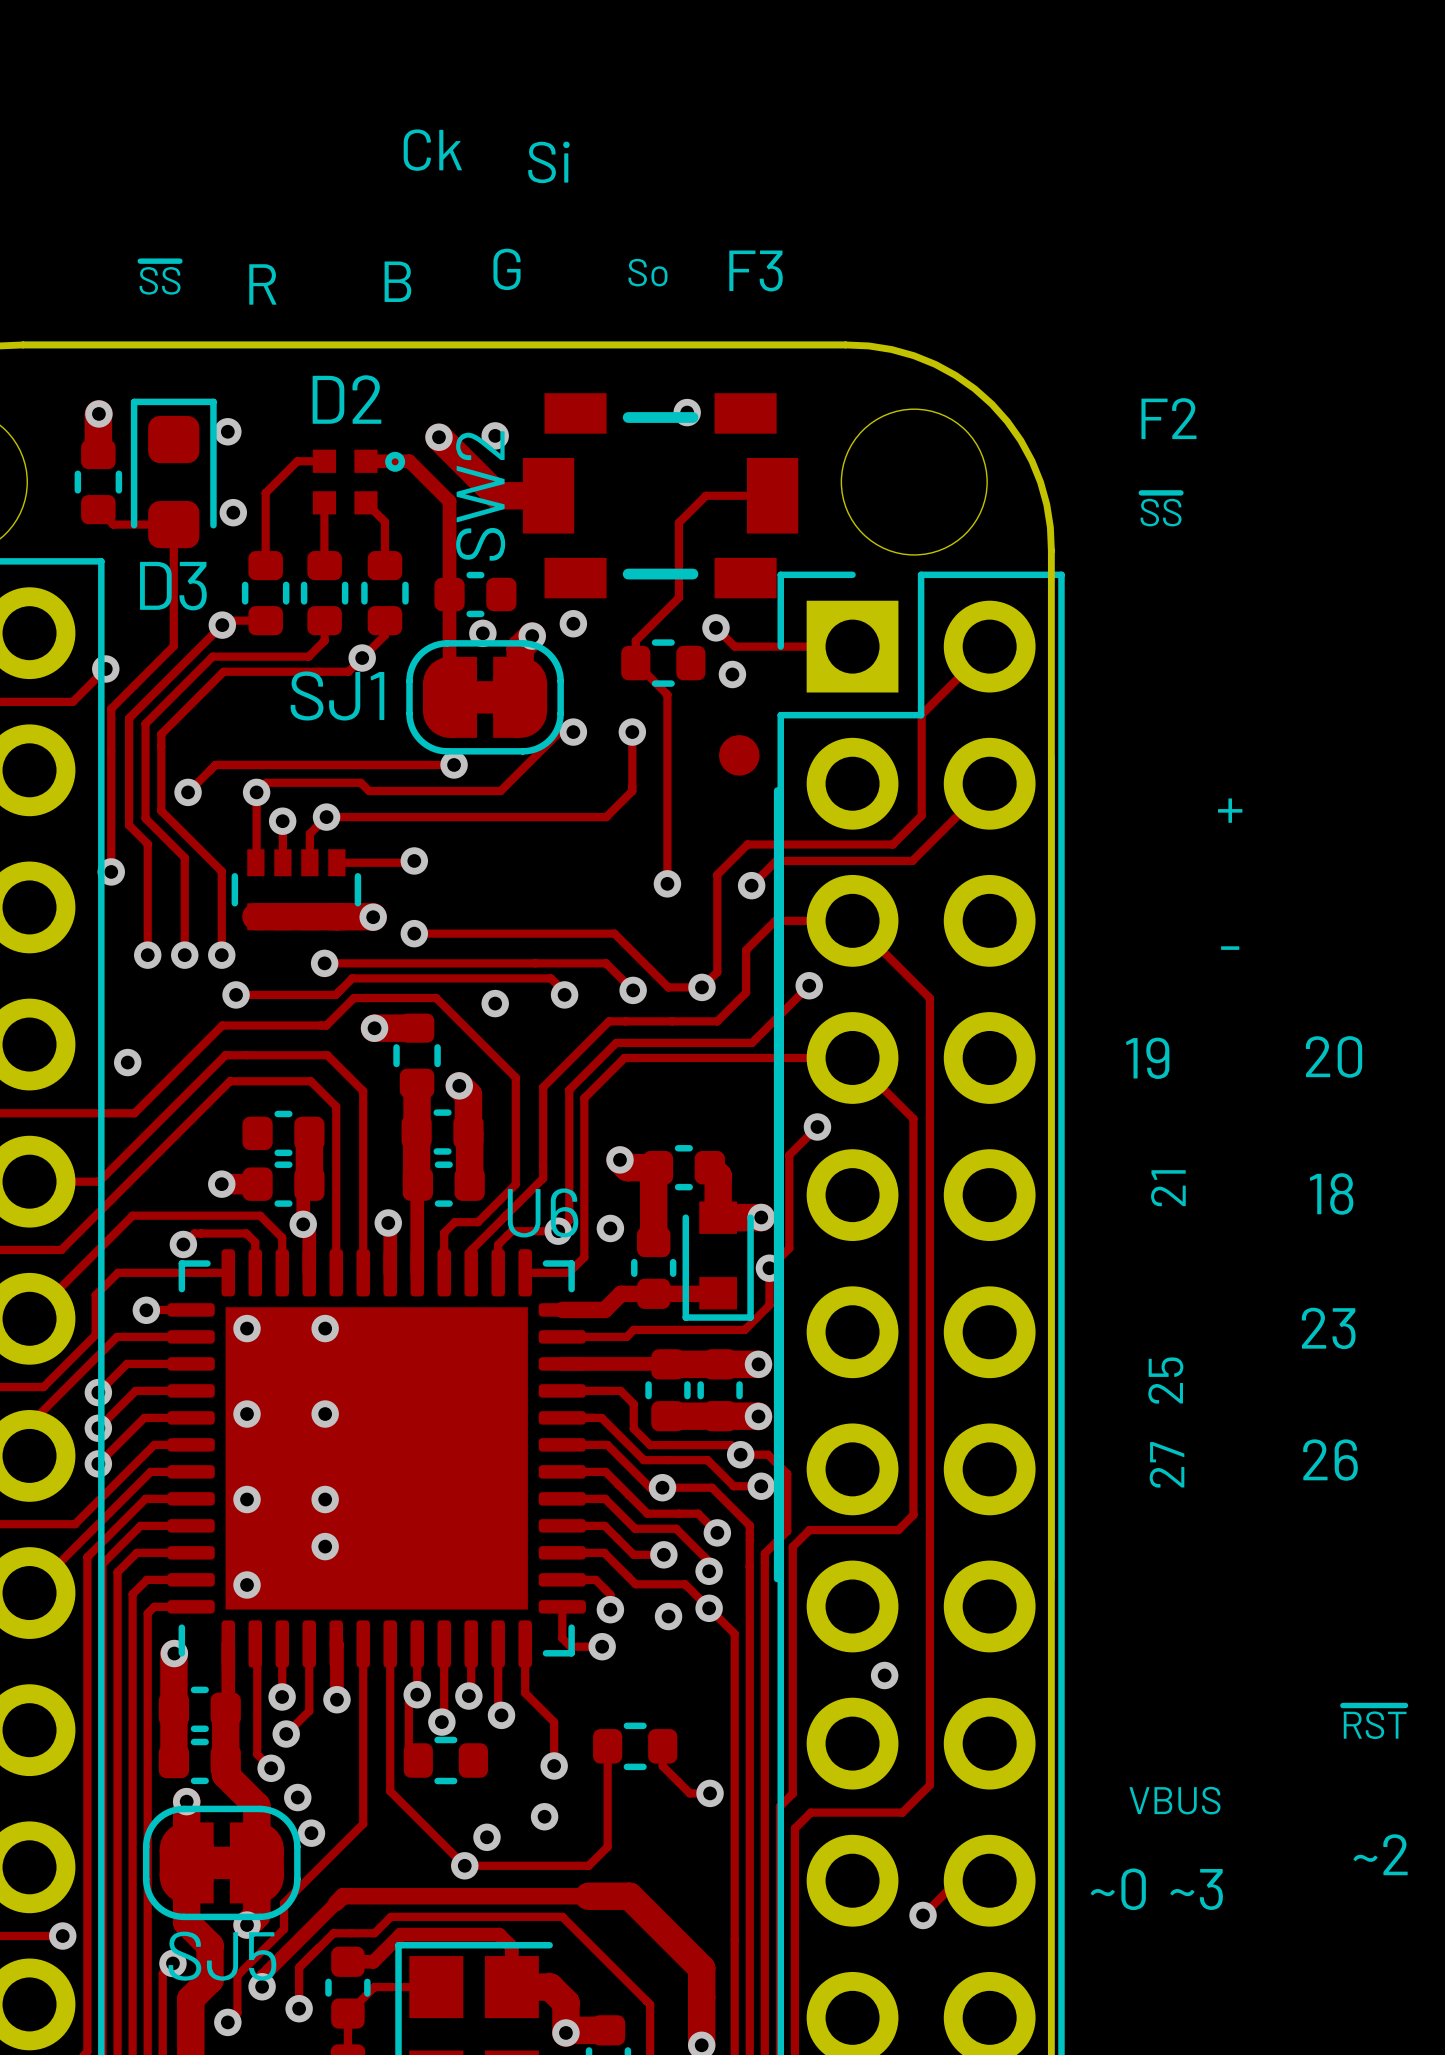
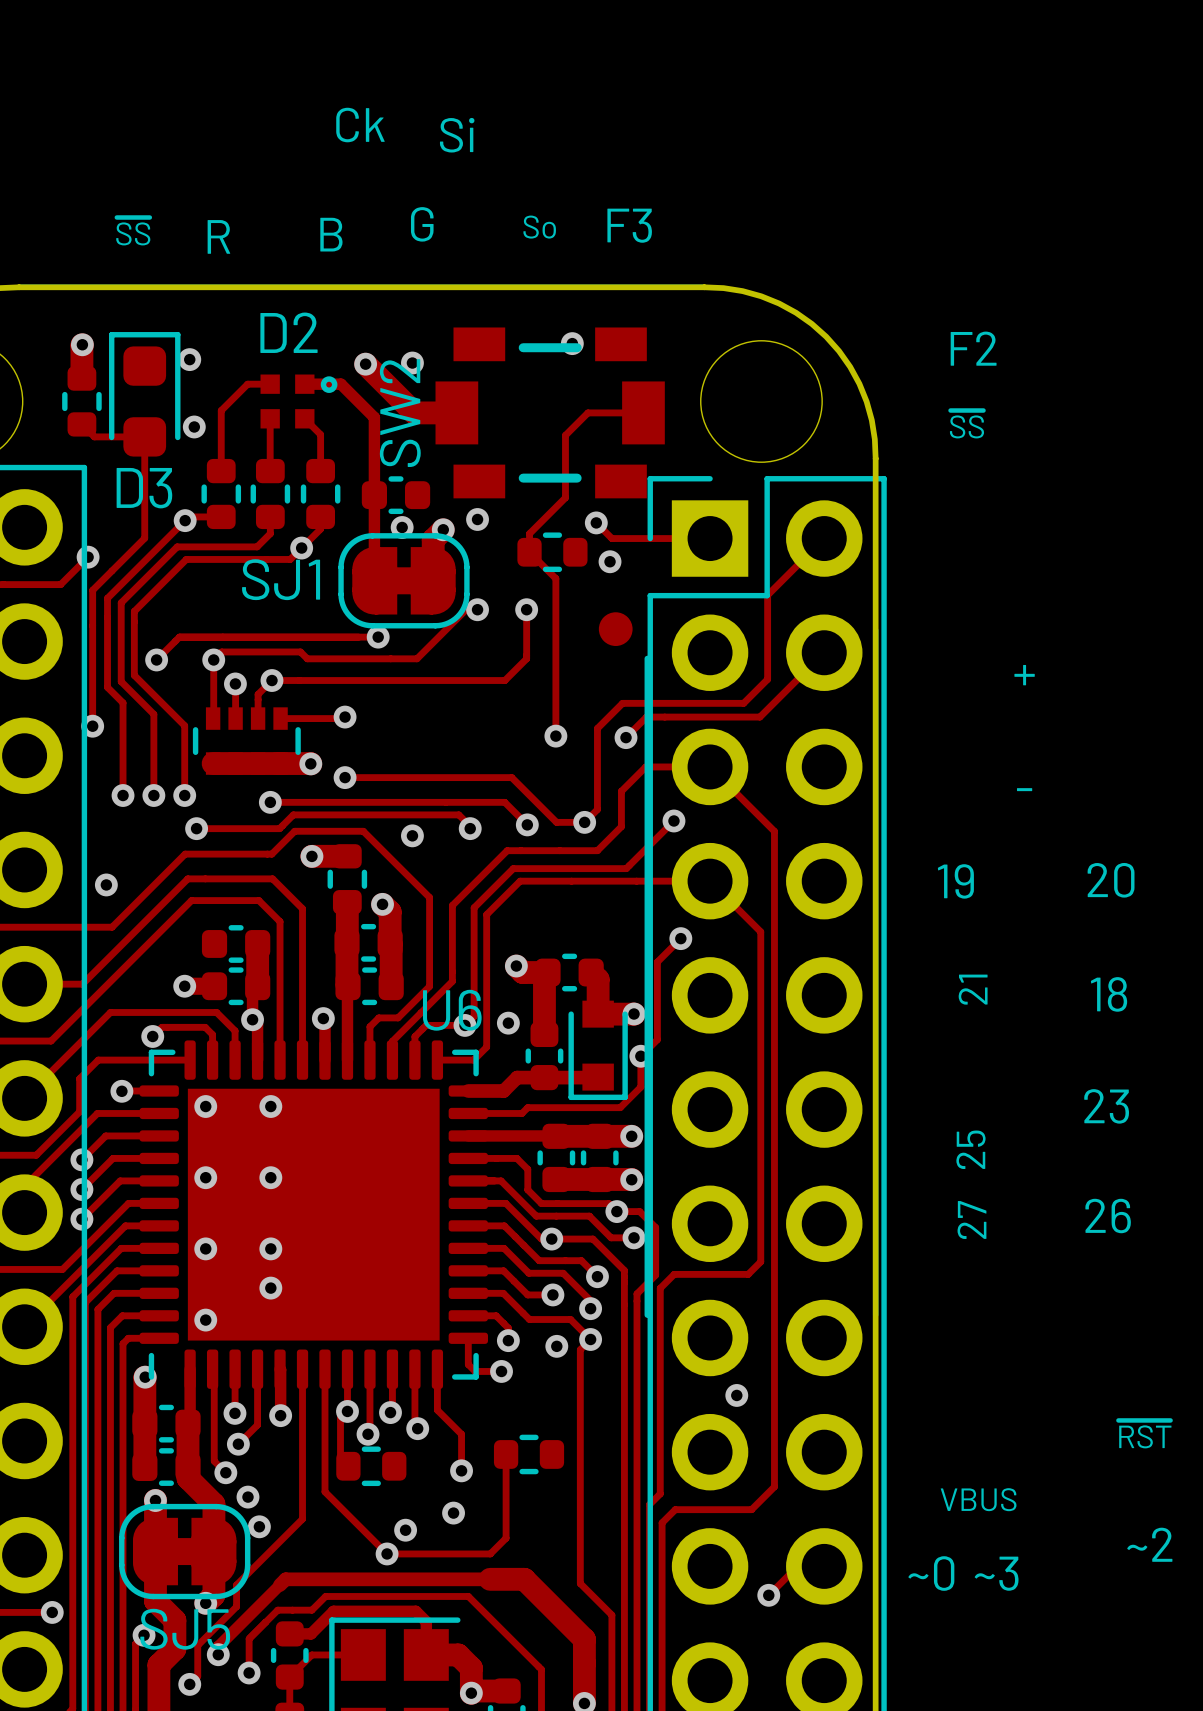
track: (709, 1608) (734, 1633) (734, 1939) -> (590, 1339) (580, 1349) (580, 1583) (611, 1615)
track: (662, 1746) (662, 1766) (689, 1793) (710, 1793) -> none
via: (710, 1793) -> none

